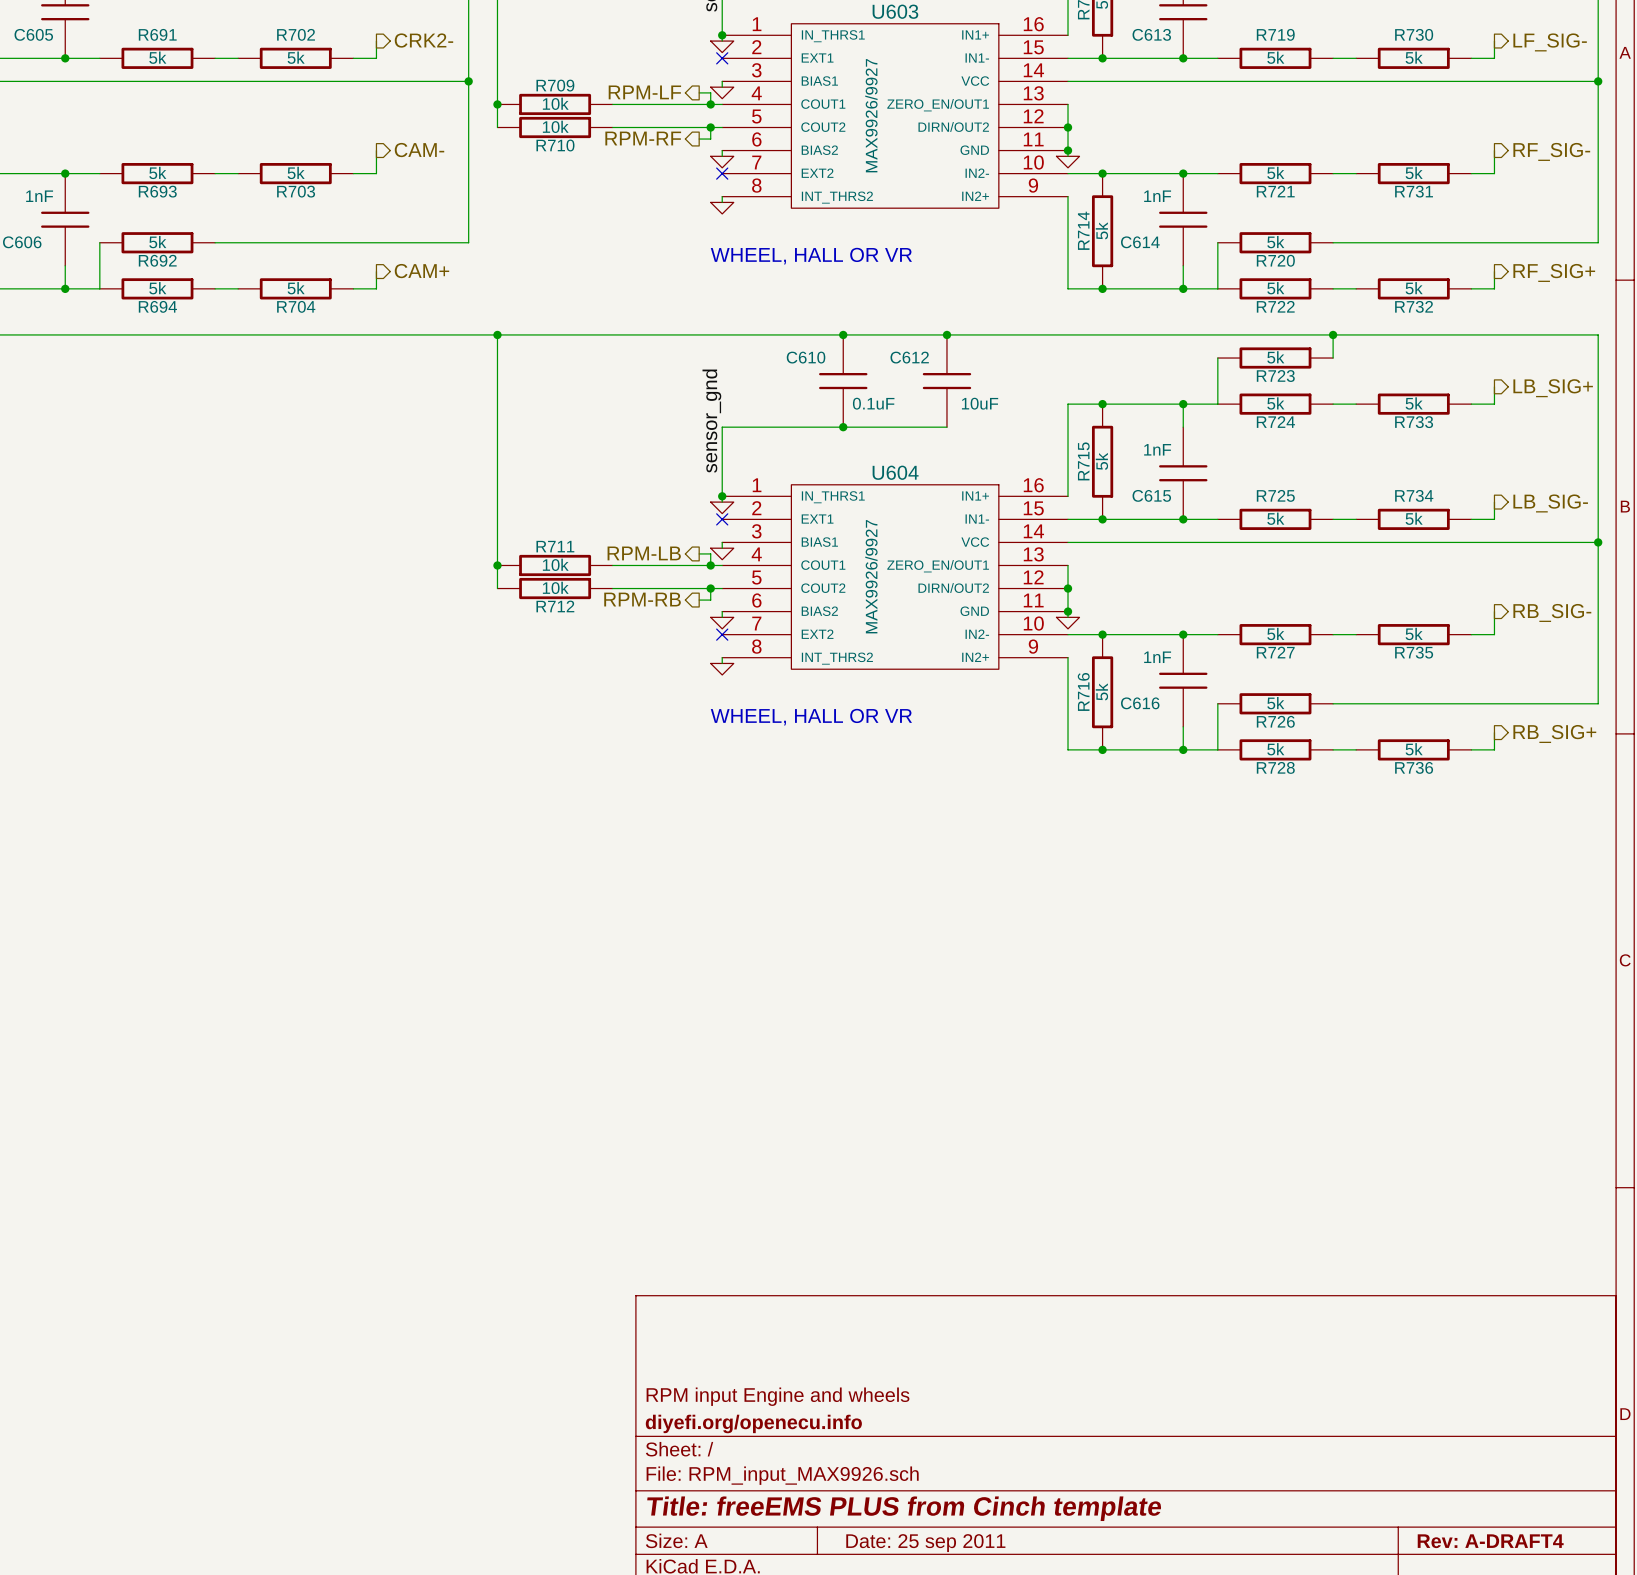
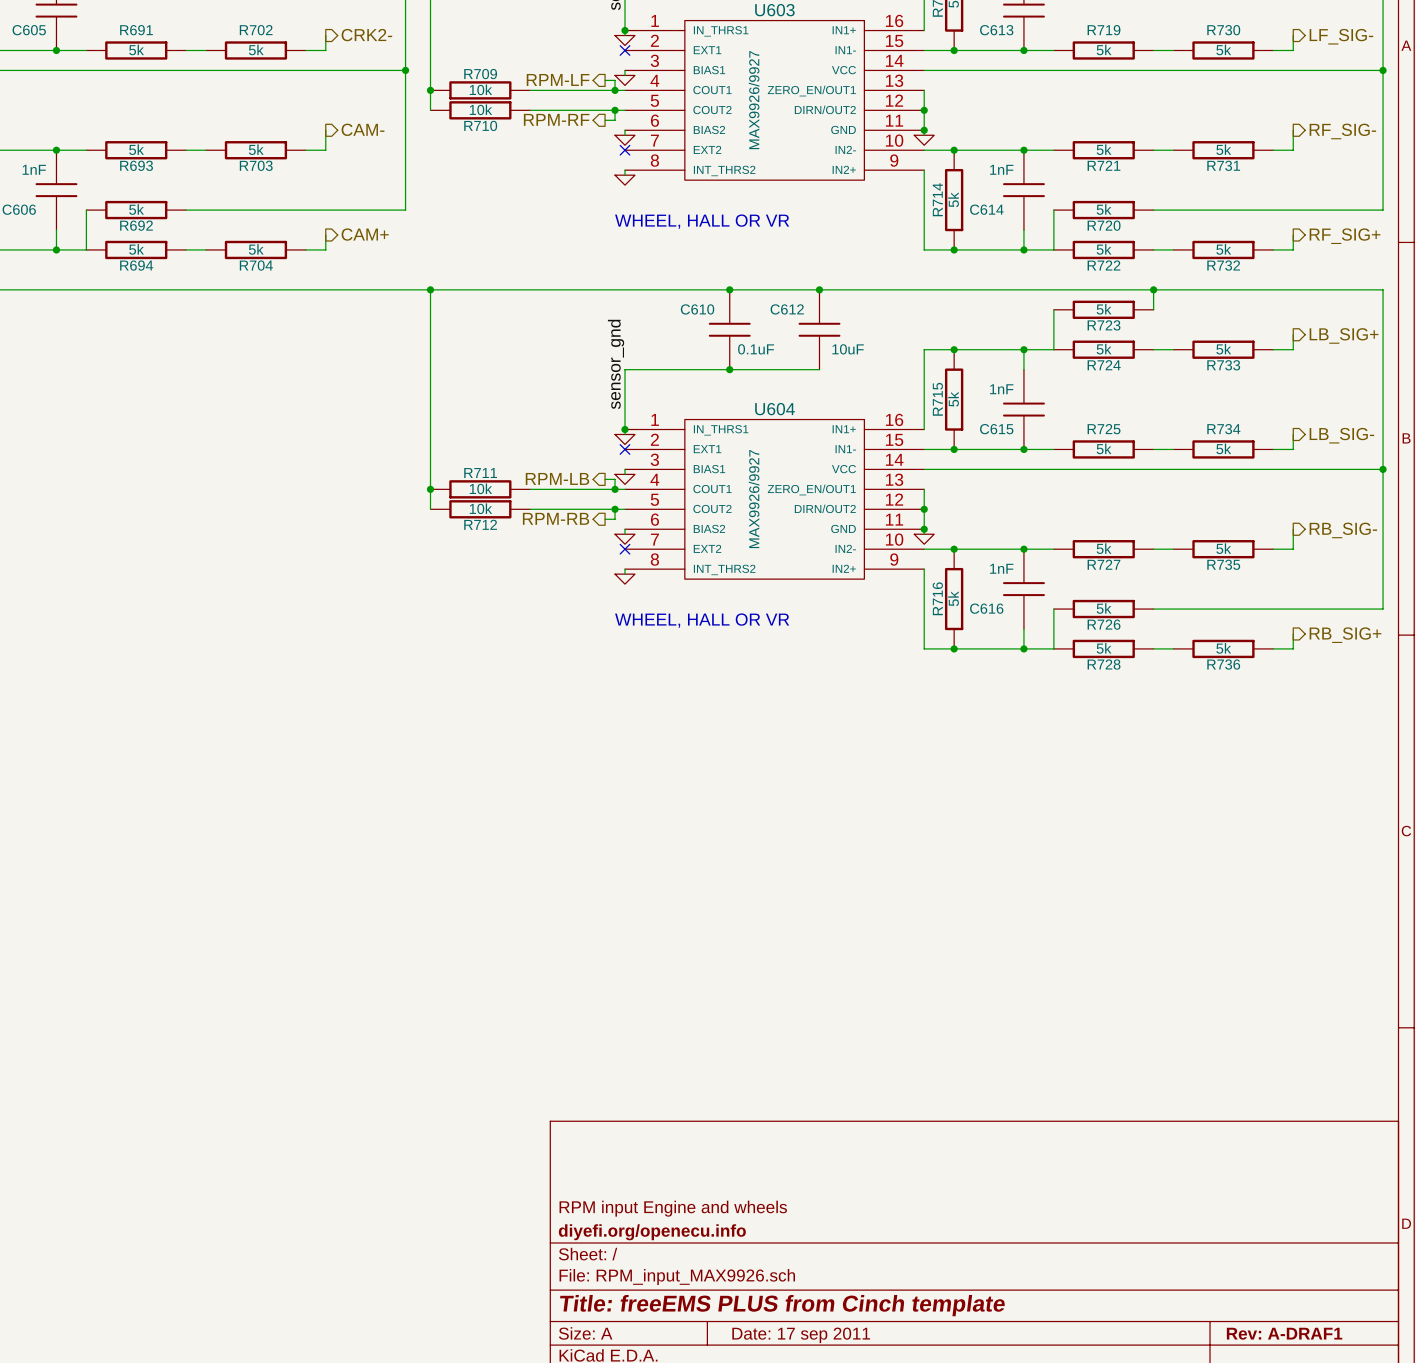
title block: Rev: A-DRAFT4 (1490, 1541) -> Rev: A-DRAF1 (1284, 1333)
title block: Date: 25 sep 2011 (925, 1543) -> Date: 17 sep 2011 (801, 1335)

